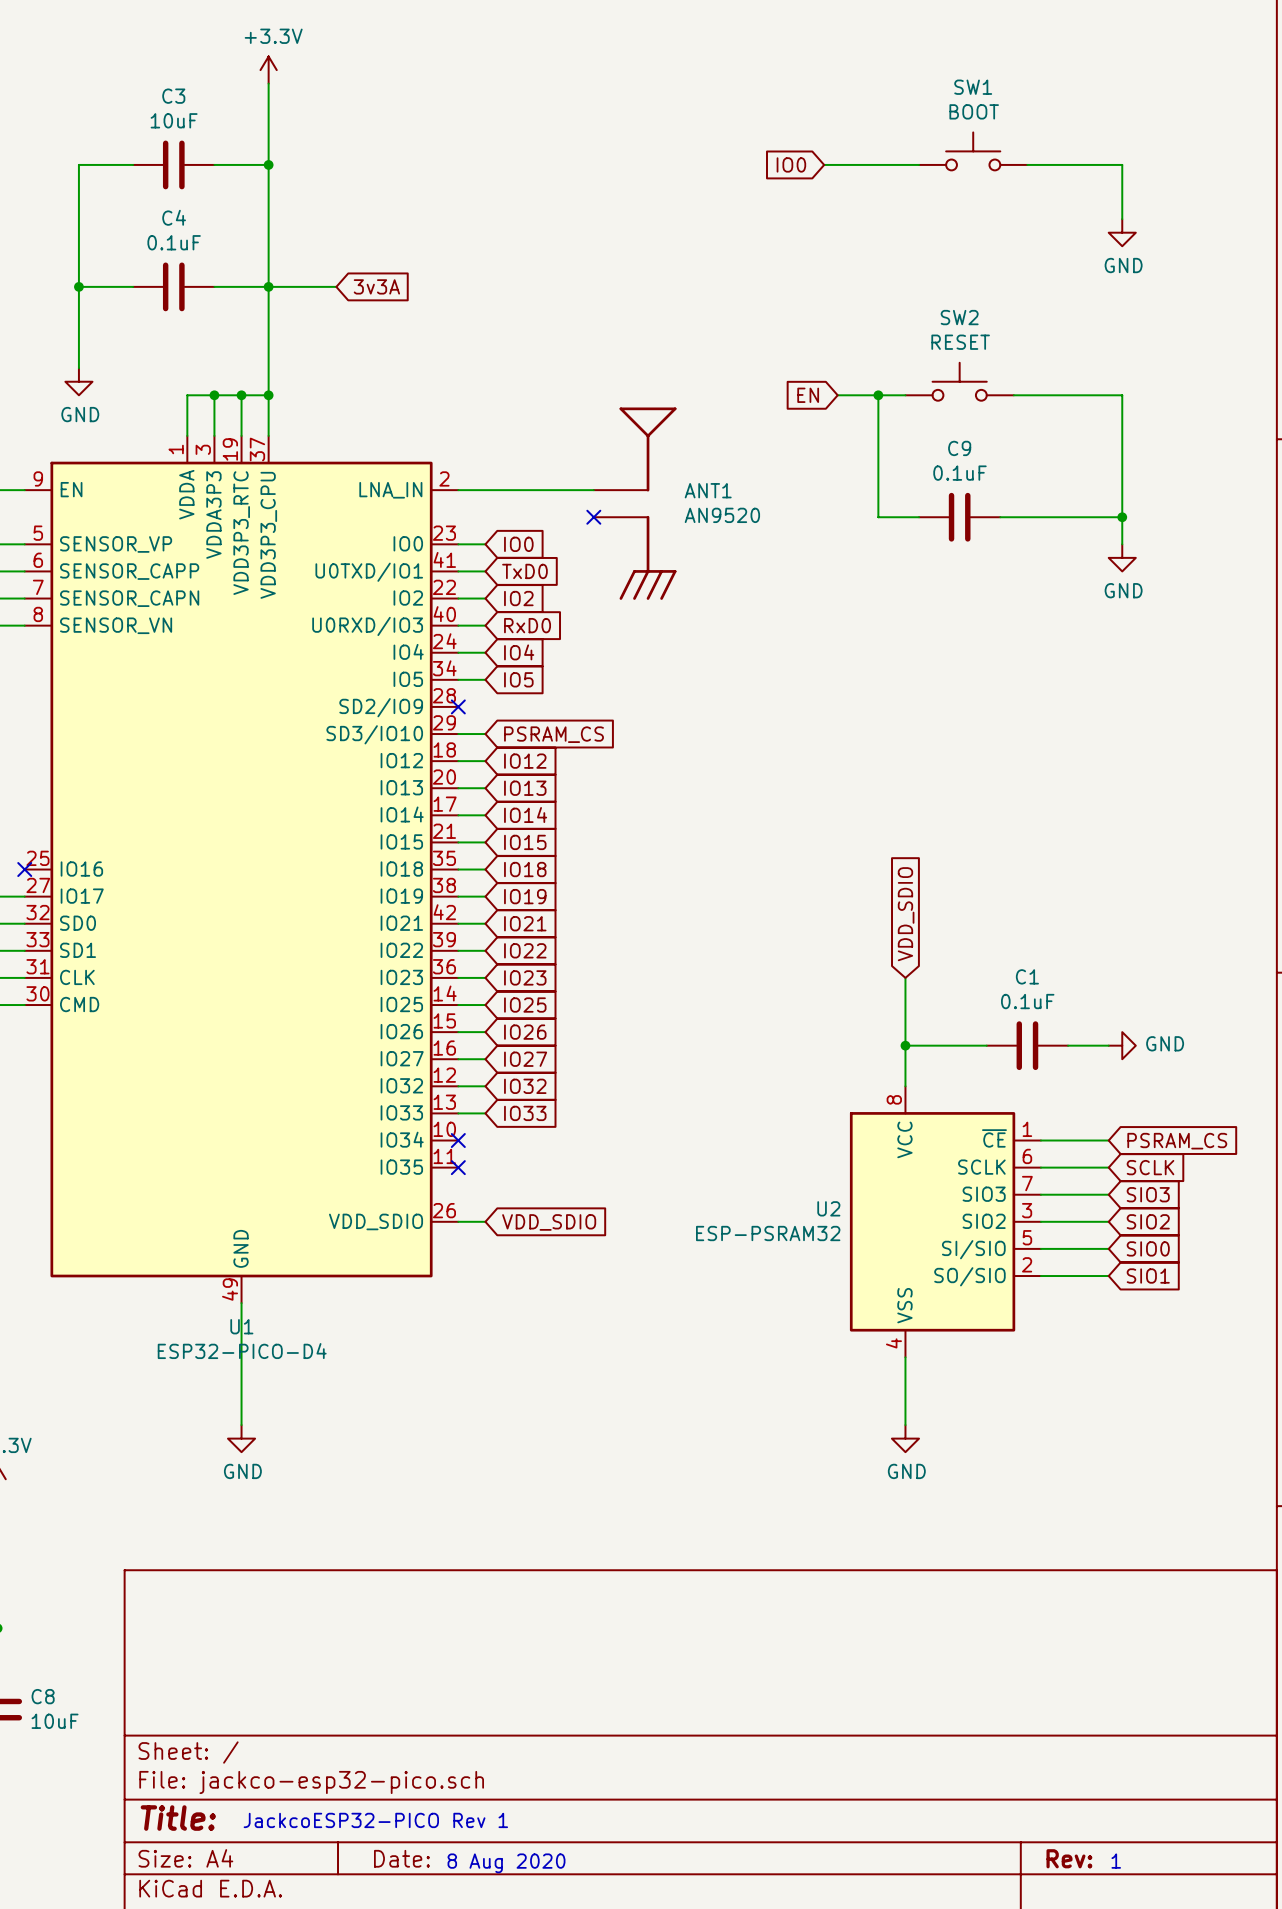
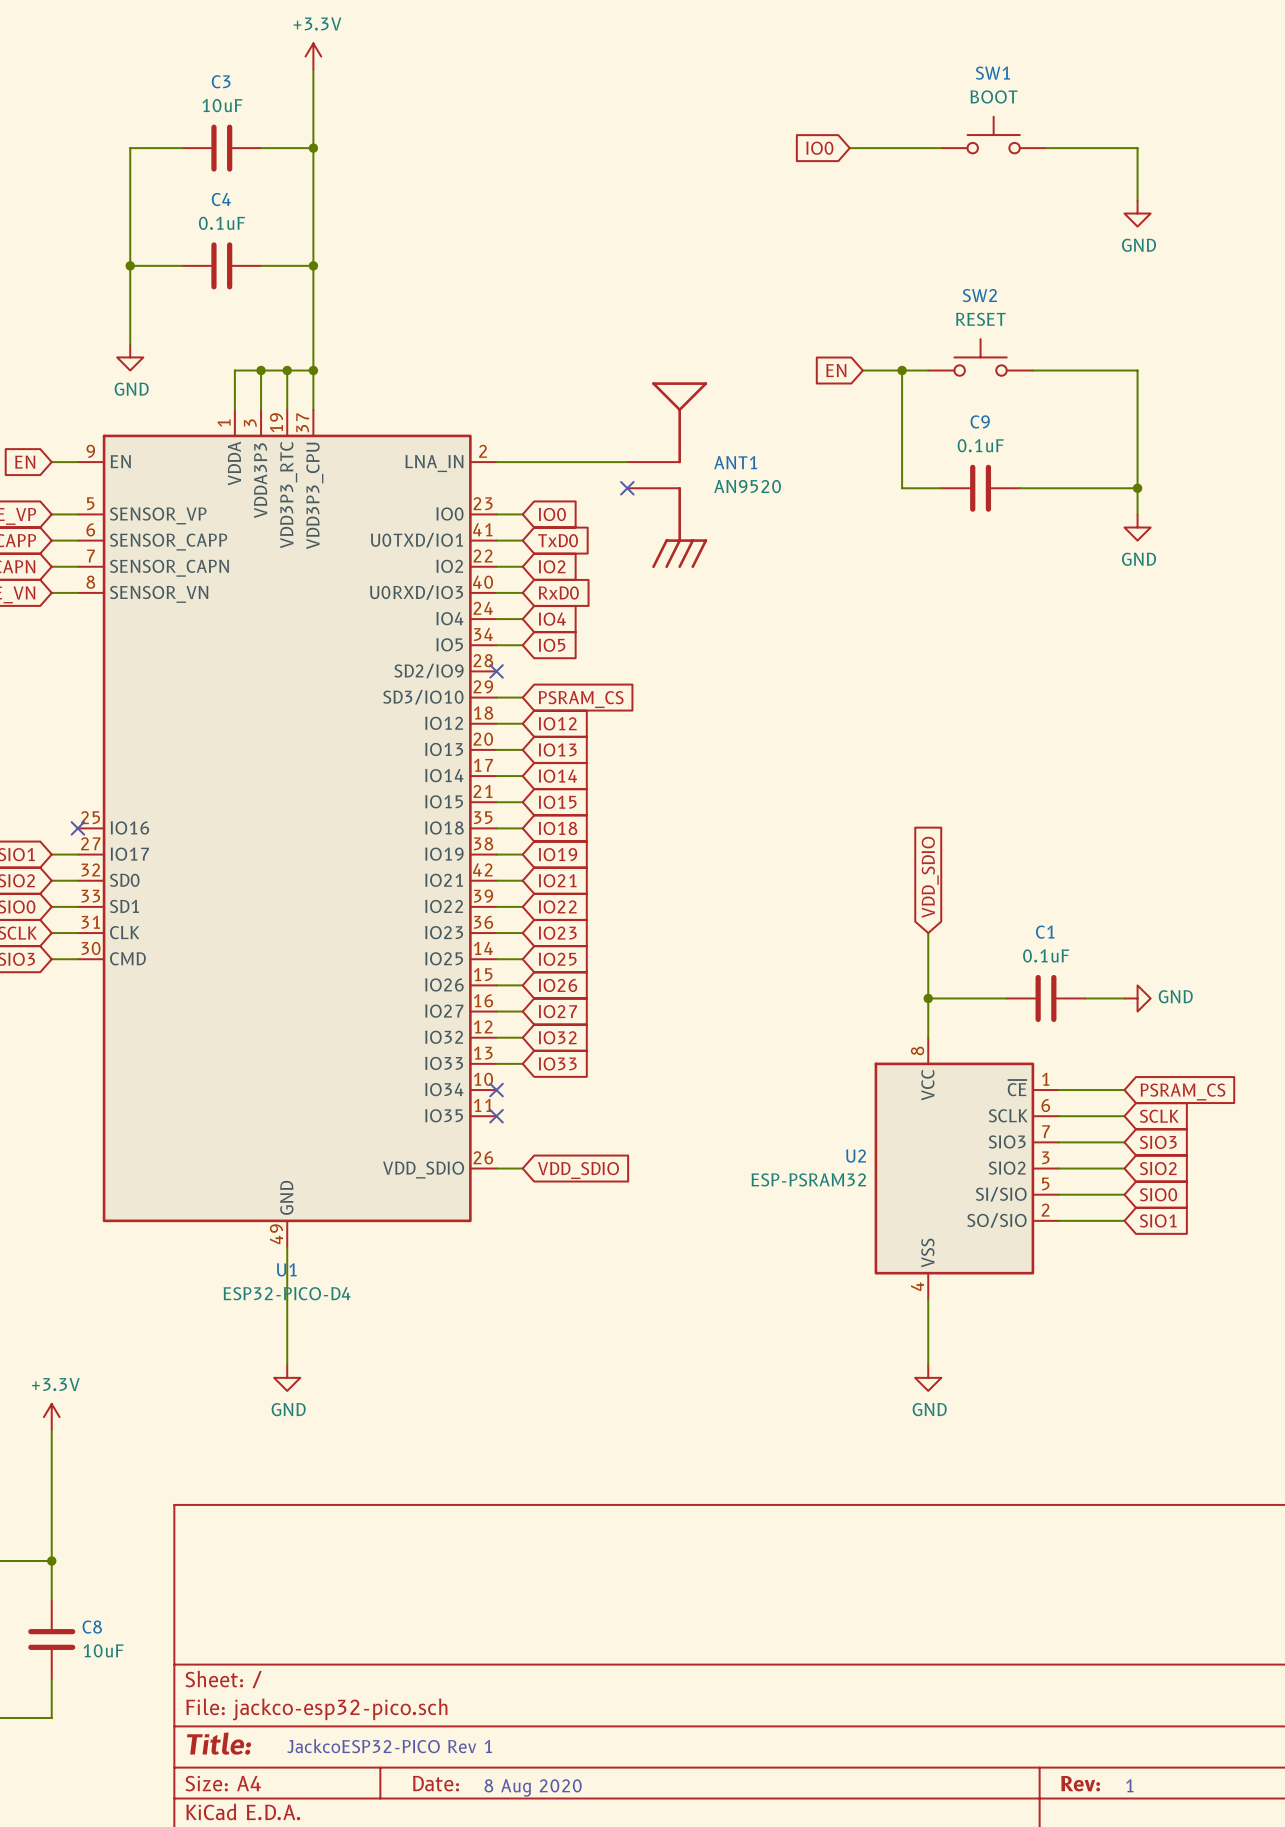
wire: (268, 286) (336, 286) -> none
global label: 3v3A (376, 286) -> none

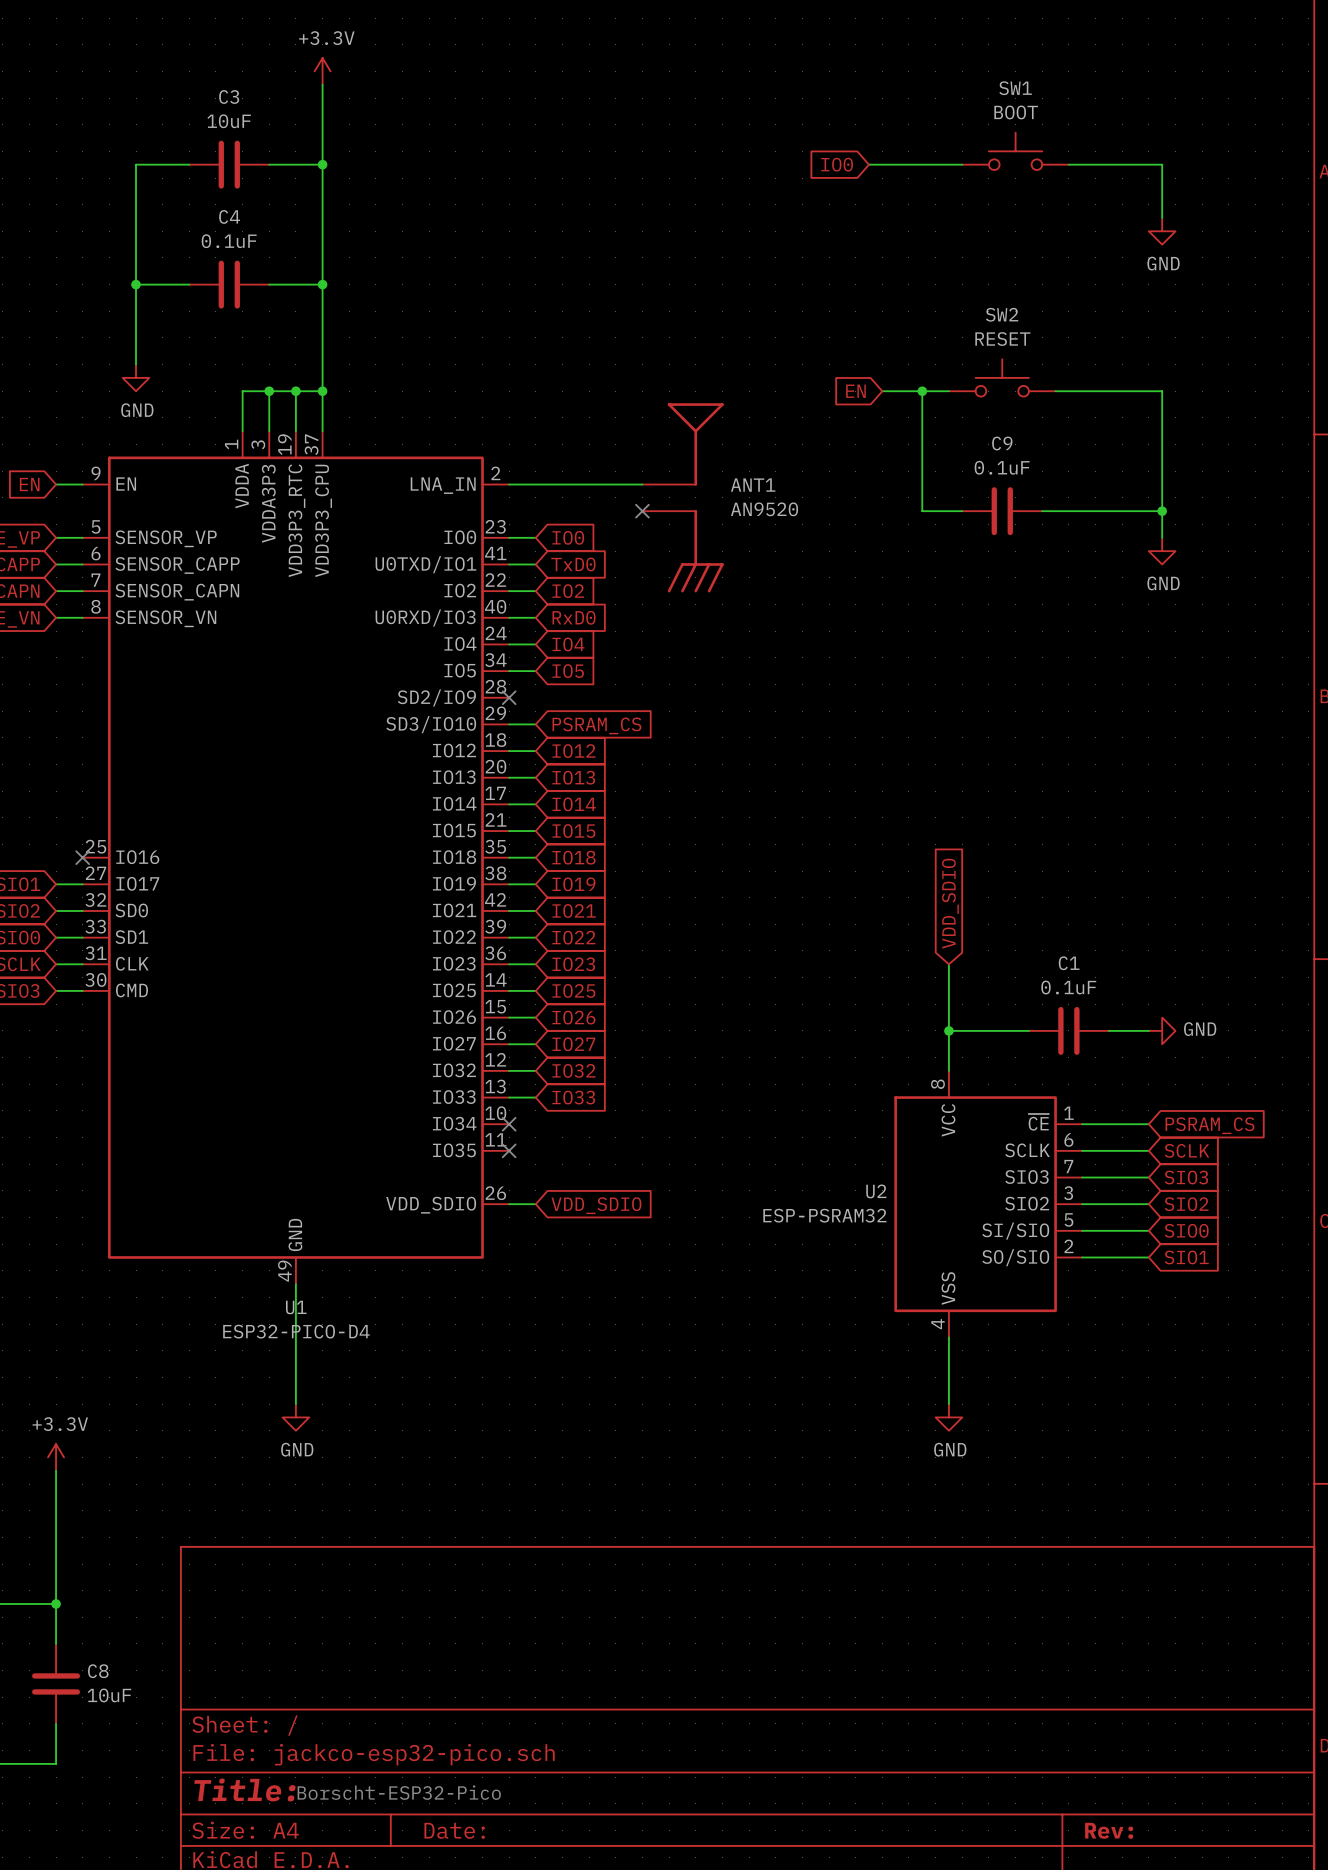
text: JackcoESP32-PICO Rev 1 (389, 1746) -> Borscht-ESP32-Pico (399, 1792)
text: 1 (1129, 1785) -> none
text: 8 Aug 2020 (533, 1787) -> none

